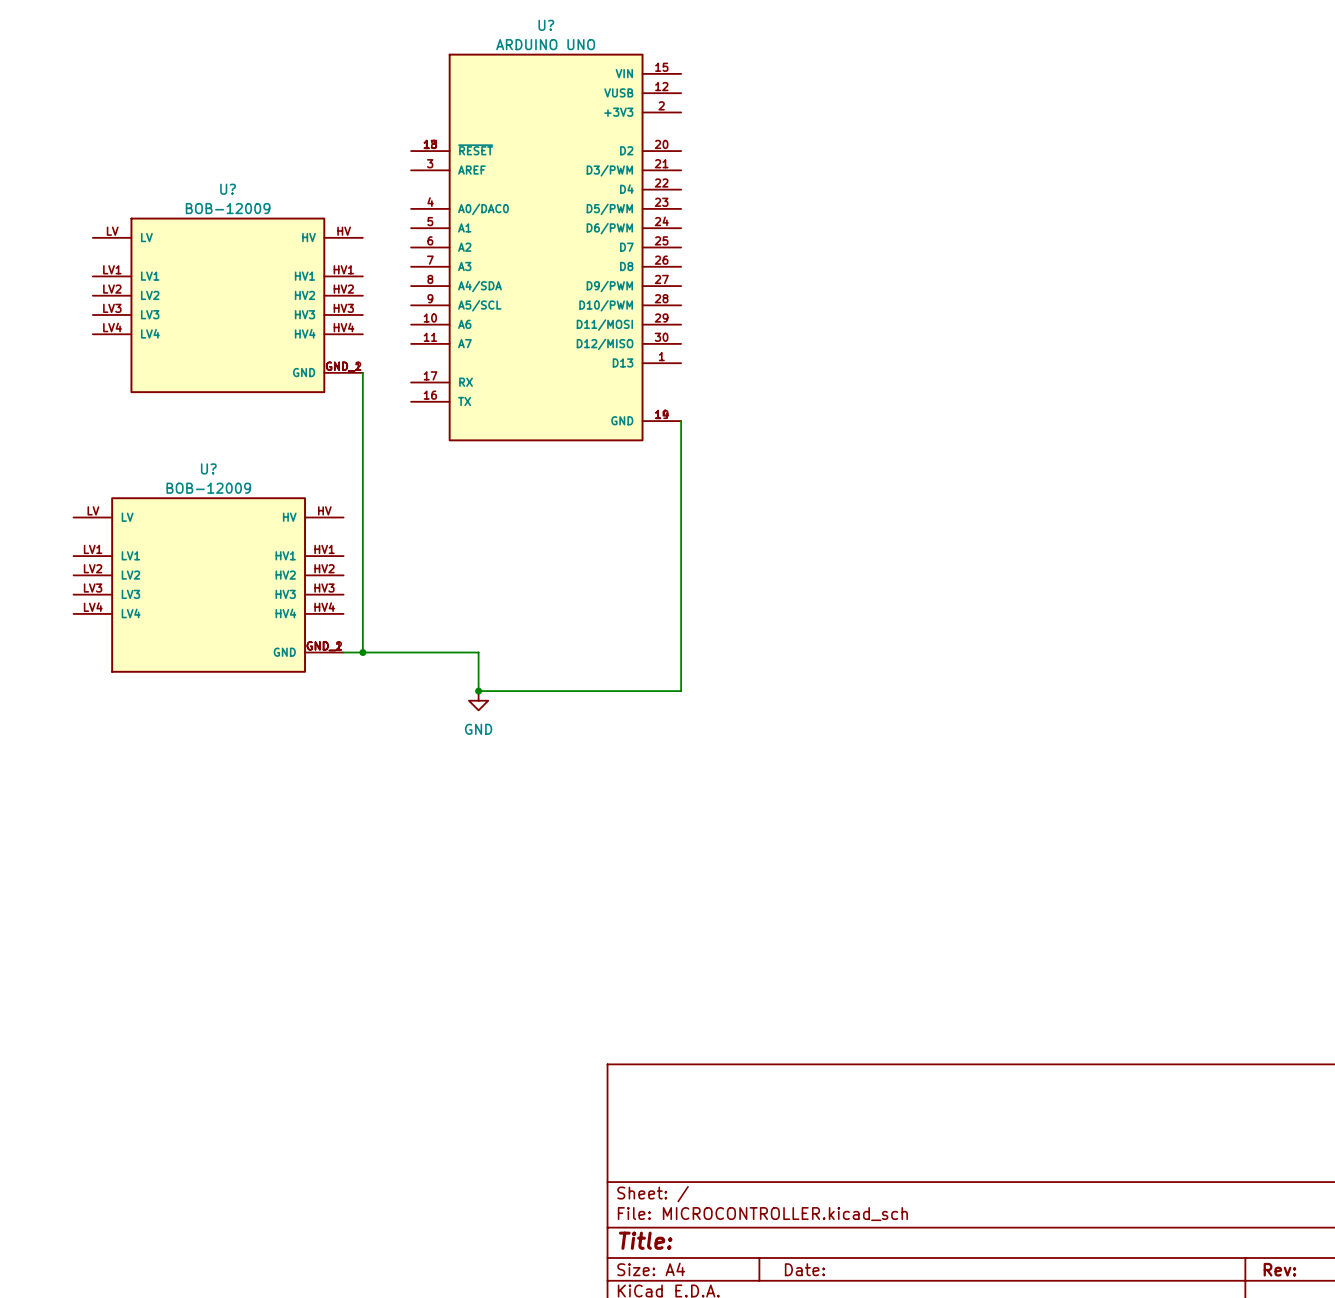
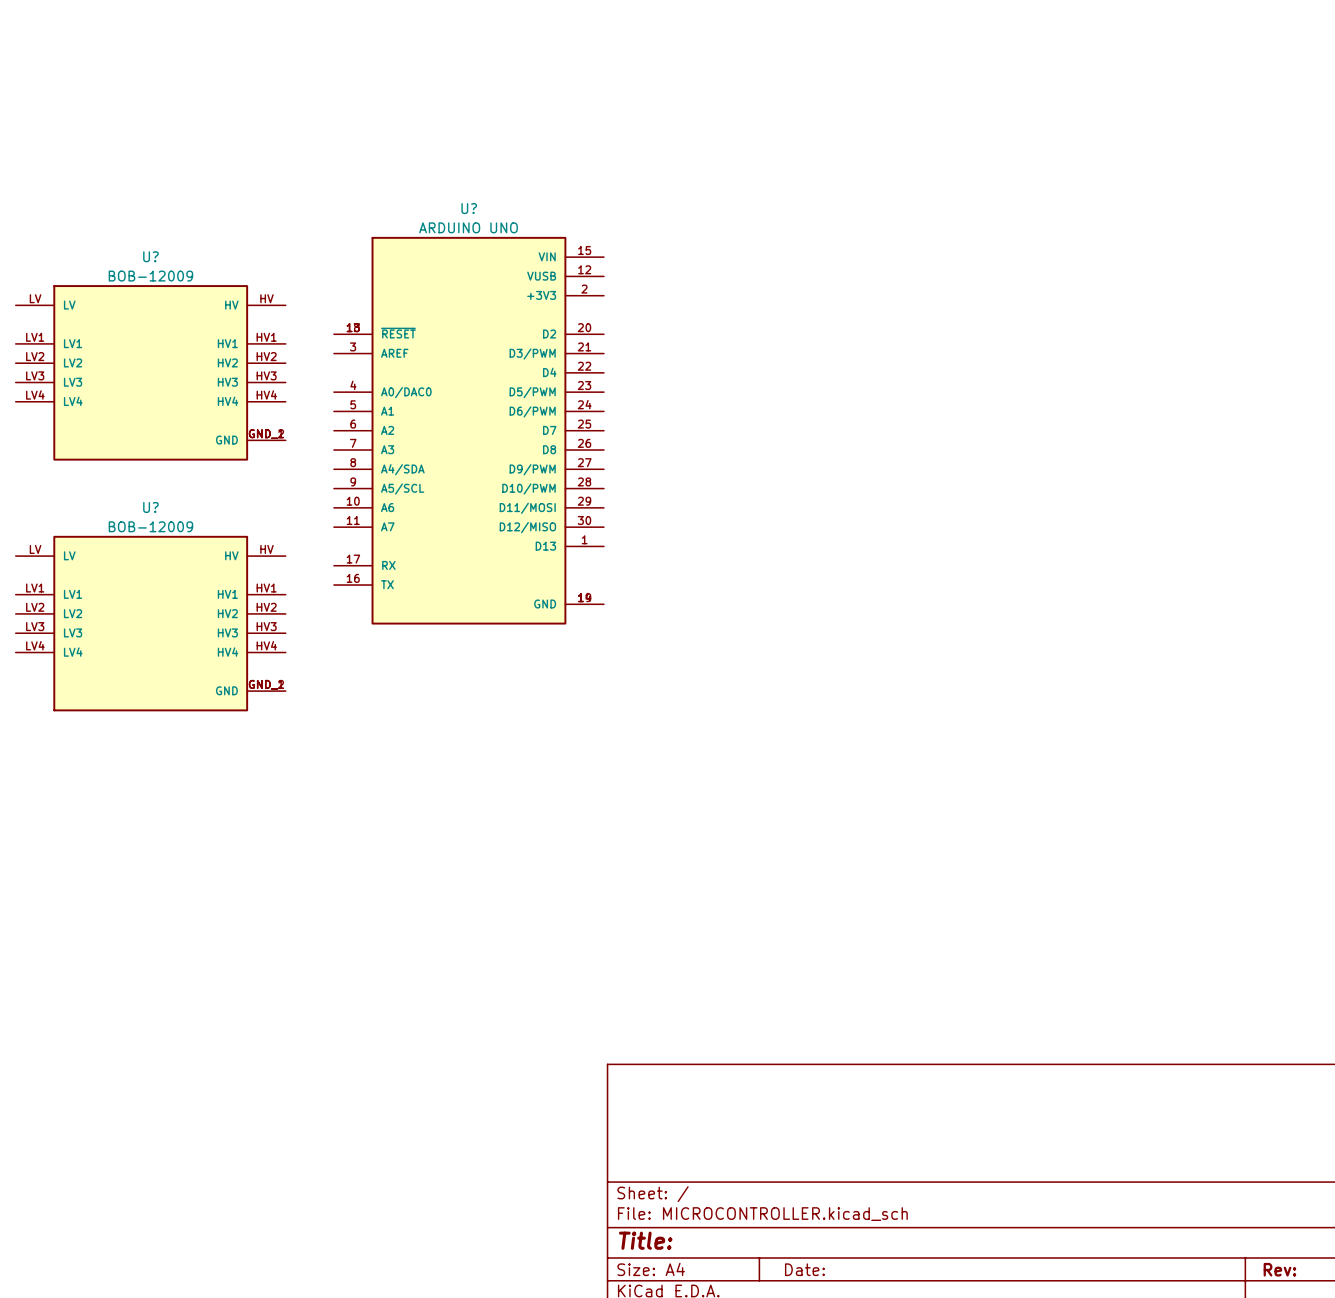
U?: ARDUINO UNO (546, 247) -> none
U? position: (227, 305) -> (150, 372)
wire: (362, 372) (362, 652) -> none
wire: (681, 421) (681, 691) (478, 691) (478, 652) (343, 652) -> none
U?: none -> ARDUINO UNO (468, 430)
U? position: (208, 585) -> (150, 623)
junction: (362, 652) -> none
junction: (478, 691) -> none
power symbol: GND (478, 700) -> none

